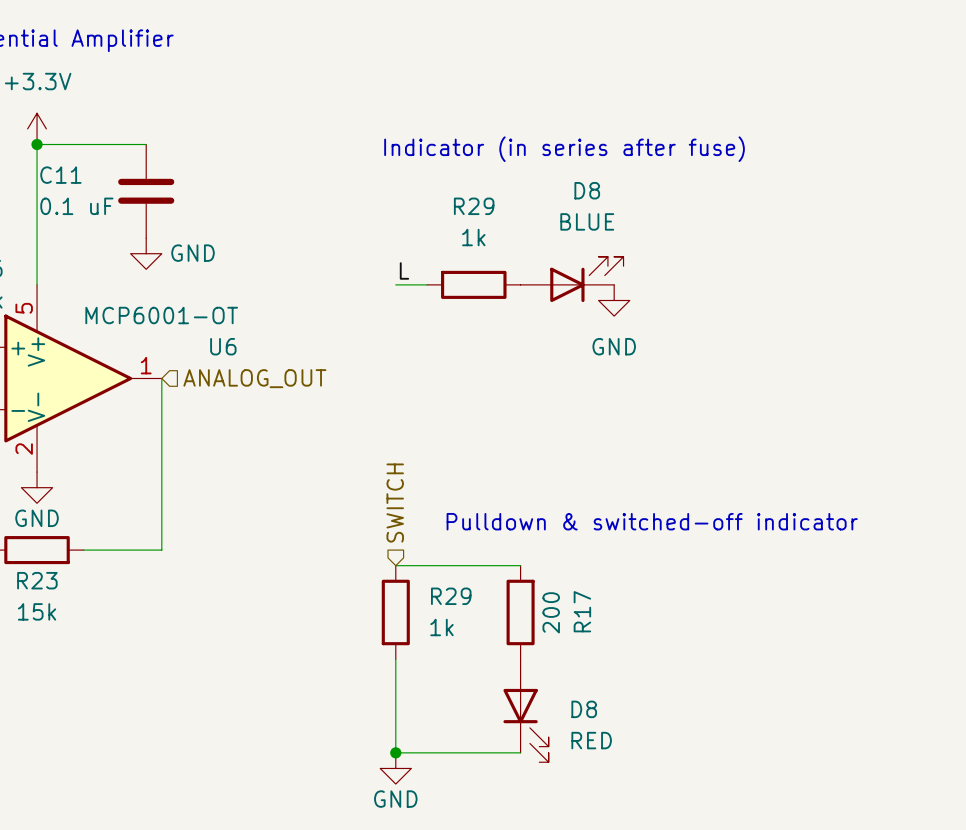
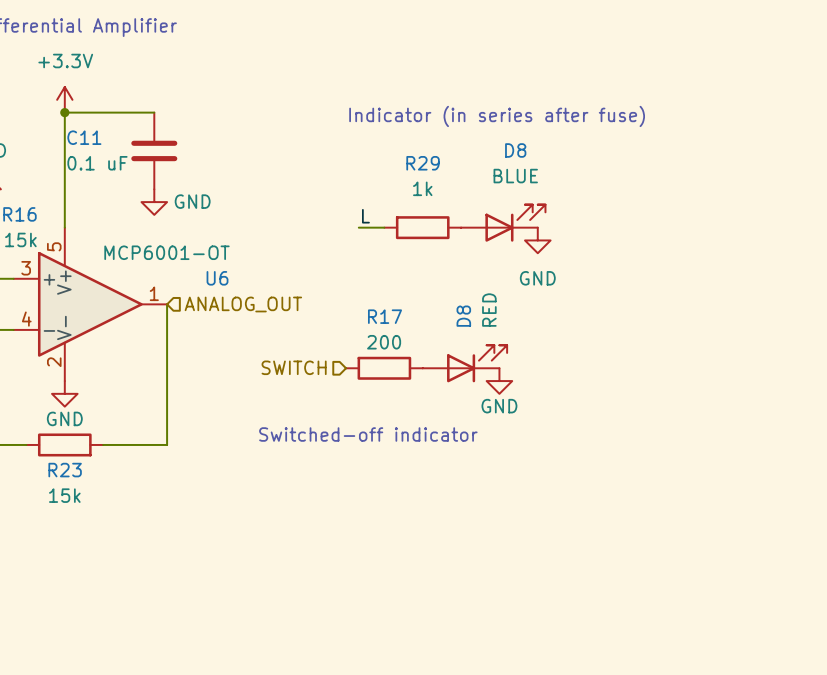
power symbol: none -> GND (499, 381)
hierarchical label rotation: 0° (395, 503) -> 90° counterclockwise (294, 367)
text: Pulldown & switched-off indicator (652, 521) -> Switched-off indicator (368, 434)
wire: (395, 565) (520, 565) -> none
R17 name position: R17 (582, 611) -> R17 (385, 316)
R29: 1k (395, 612) -> none
R17 rotation: 0° (520, 612) -> 90° clockwise (384, 368)
R17 position: (520, 612) -> (384, 368)
R17 value position: 200 (551, 612) -> 200 (384, 342)
wire: (395, 659) (395, 752) (520, 752) -> none
D8 position: (526, 710) -> (464, 363)
D8 rotation: 0° (526, 725) -> 90° counterclockwise (477, 363)
junction: (395, 752) -> none
power symbol: GND (395, 768) -> none

